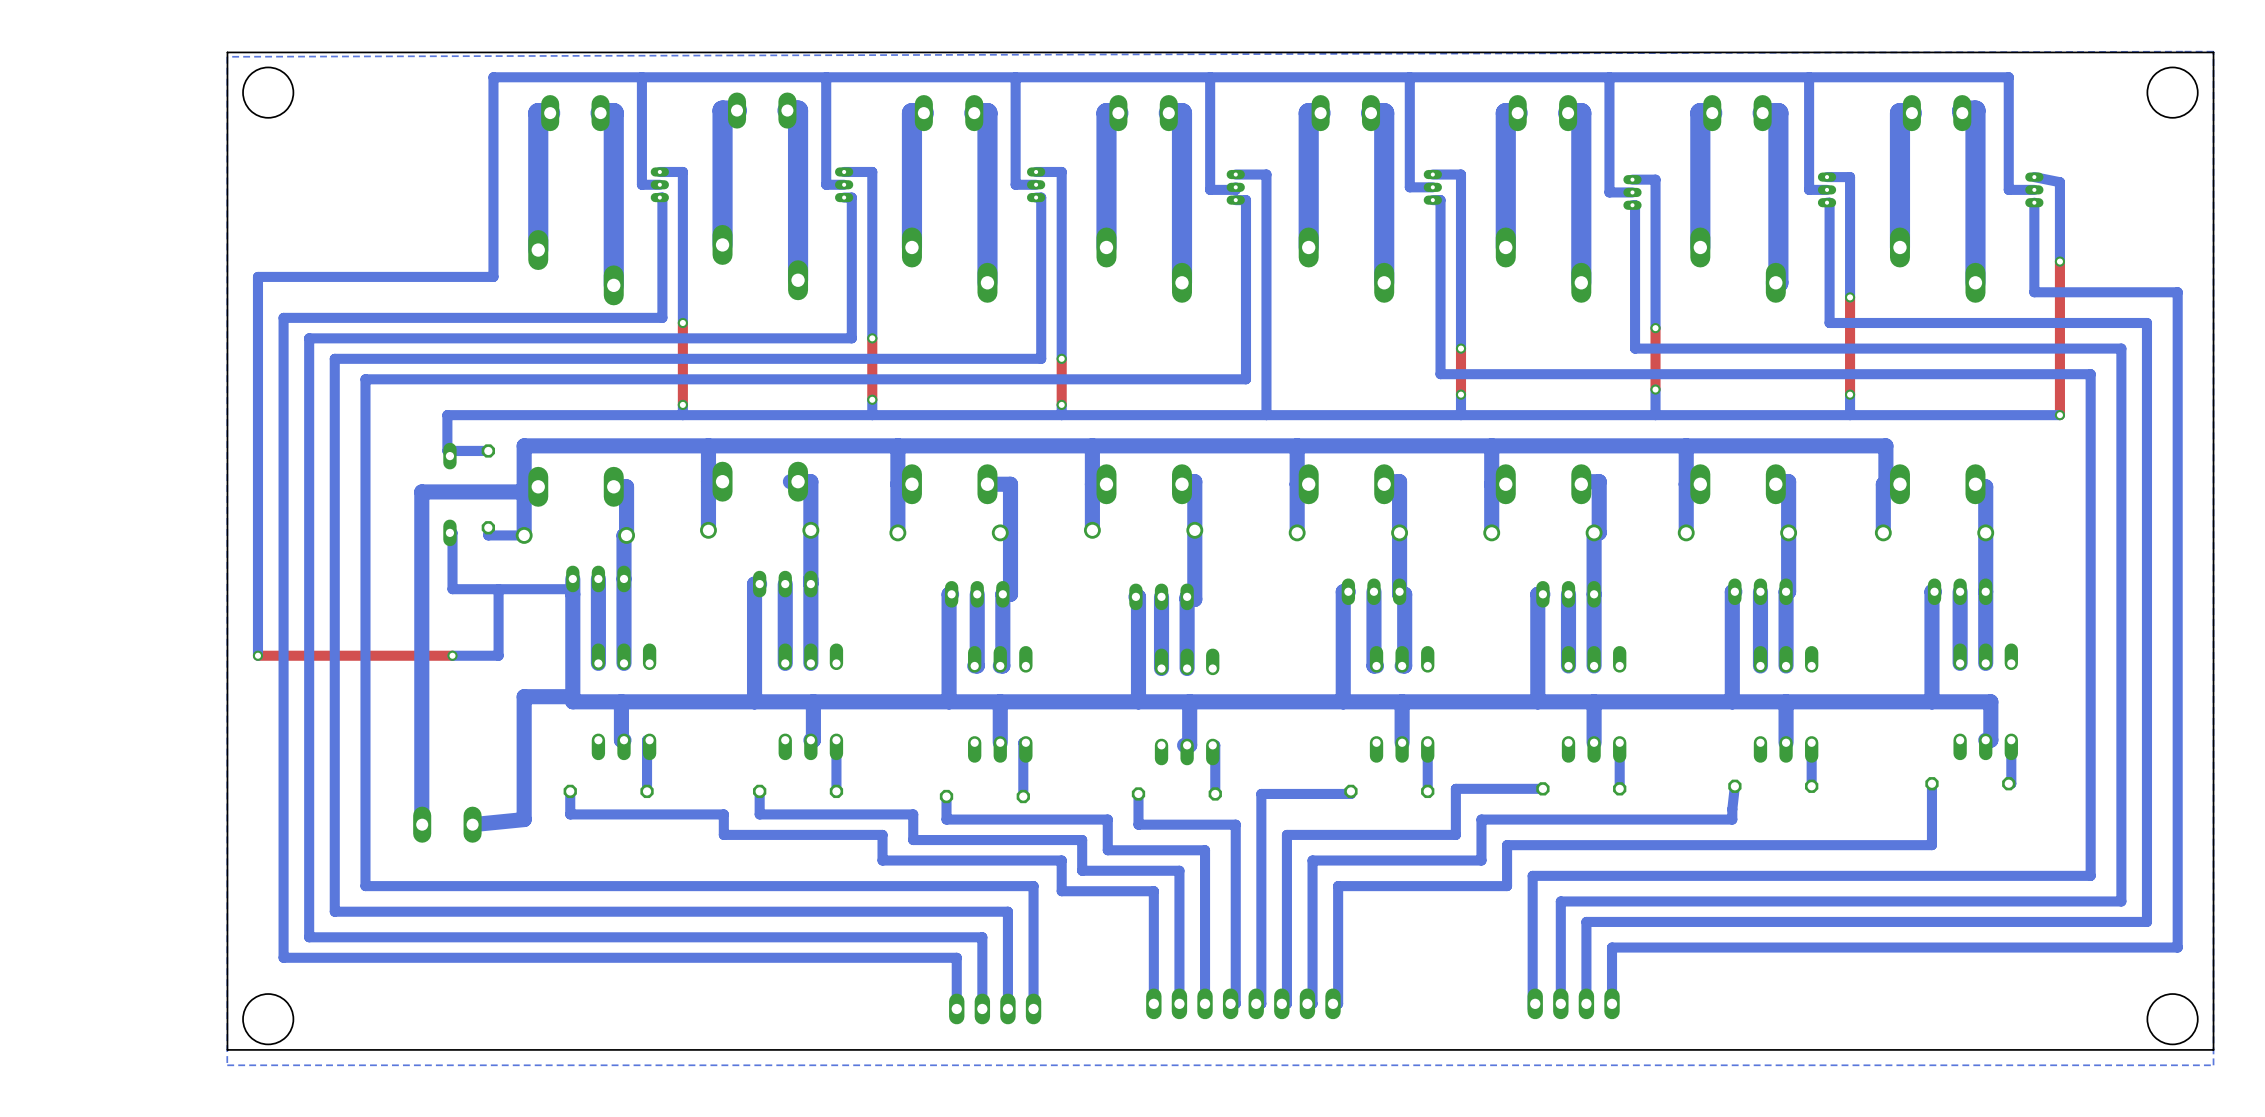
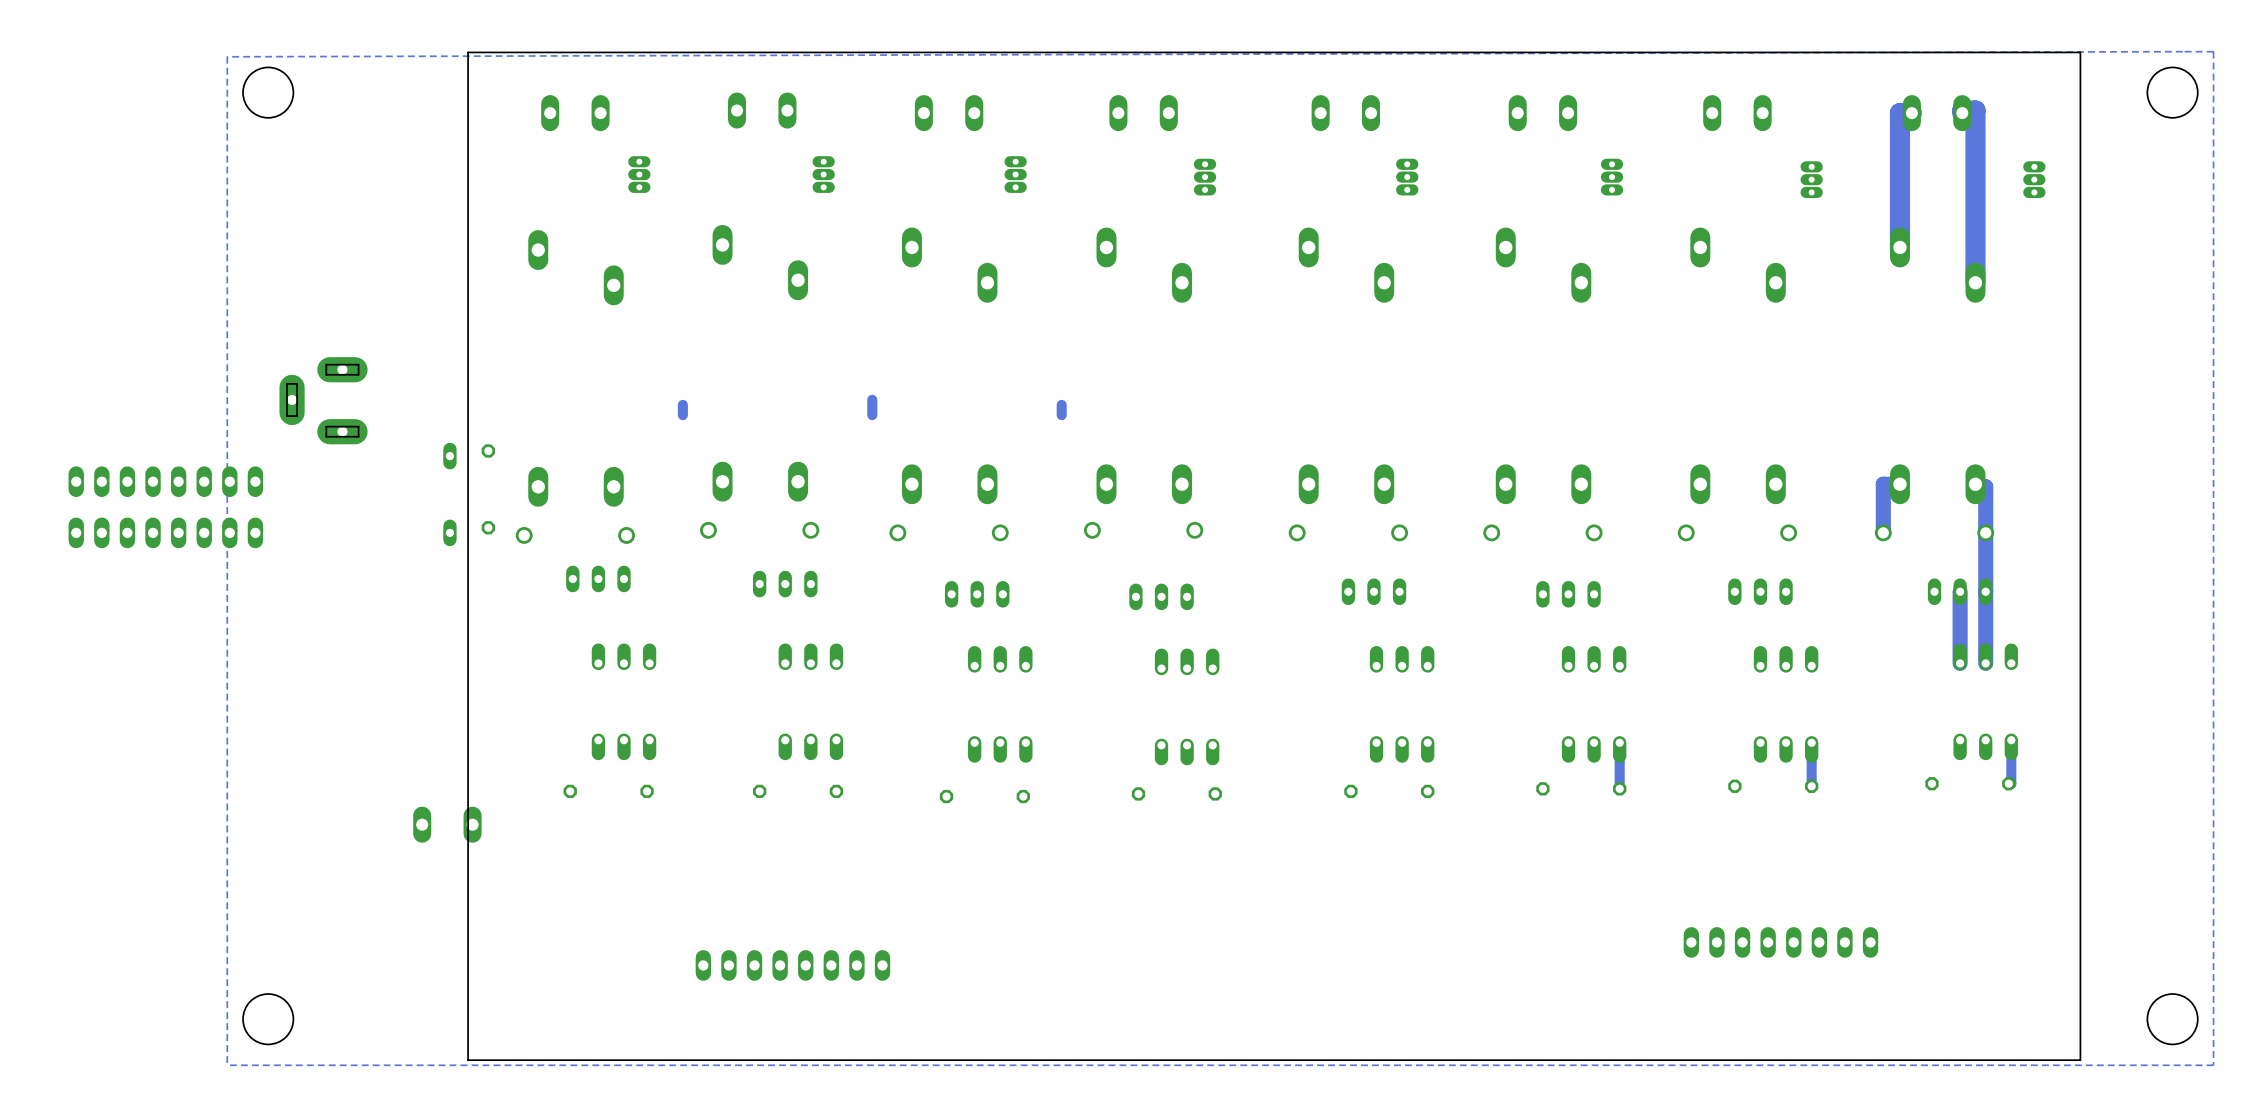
board edge: (2080, 52) (2213, 52) (2213, 1049) (227, 1049) (227, 52) (468, 52) -> (2080, 52) (2080, 1060) (468, 1060) (468, 52)
bottom track: (641, 77) (641, 184) (659, 184) -> none
bottom track: (826, 77) (826, 184) (844, 184) -> none
bottom track: (1015, 77) (1015, 184) (1036, 184) -> none
bottom track: (1210, 77) (1210, 189) (1235, 189) (1235, 187) -> none
bottom track: (1409, 77) (1409, 187) (1432, 187) -> none
bottom track: (1609, 77) (1609, 192) (1632, 192) -> none
bottom track: (1809, 77) (1809, 189) (1827, 189) -> none
bottom track: (737, 110) (722, 110) (722, 244) -> none
bottom track: (787, 110) (798, 110) (798, 280) -> none
bottom track: (550, 113) (538, 113) (538, 250) -> none
bottom track: (600, 113) (613, 113) (613, 285) -> none
bottom track: (923, 113) (911, 113) (911, 247) -> none
bottom track: (974, 113) (987, 113) (987, 282) -> none
bottom track: (1118, 113) (1106, 113) (1106, 247) -> none
bottom track: (1168, 113) (1182, 113) (1182, 282) -> none
bottom track: (1320, 113) (1308, 113) (1308, 247) -> none
bottom track: (1371, 113) (1384, 113) (1384, 282) -> none
bottom track: (1517, 113) (1505, 113) (1505, 247) -> none
bottom track: (1568, 113) (1581, 113) (1581, 282) -> none
bottom track: (1712, 113) (1700, 113) (1700, 247) -> none
bottom track: (1762, 113) (1778, 113) (1778, 282) (1775, 282) -> none
bottom track: (659, 171) (682, 171) (682, 322) -> none
bottom track: (844, 171) (872, 171) (872, 338) -> none
bottom track: (1036, 171) (1061, 171) (1061, 358) -> none
part: none -> (639, 174)
part: none -> (823, 174)
part: none -> (1015, 174)
bottom track: (1235, 174) (1266, 174) (1266, 415) -> none
bottom track: (1432, 174) (1461, 174) (1461, 348) -> none
part: none -> (1205, 177)
part: none -> (1407, 177)
part: none -> (1612, 177)
bottom track: (1827, 177) (1850, 177) (1850, 297) -> none
bottom track: (2034, 177) (2059, 182) (2059, 261) -> none
bottom track: (1632, 179) (1655, 179) (1655, 328) -> none
part: none -> (1811, 179)
part: none -> (2034, 179)
part: (659, 184) -> none
part: (844, 184) -> none
part: (1036, 184) -> none
part: (1235, 187) -> none
part: (1432, 187) -> none
part: (1827, 189) -> none
bottom track: (2034, 189) (2008, 189) (2008, 77) (493, 77) (493, 276) (257, 276) (257, 655) -> none
part: (2034, 189) -> none
part: (1632, 192) -> none
bottom track: (659, 197) (662, 197) (662, 317) (283, 317) (283, 957) (956, 957) (956, 1008) -> none
bottom track: (844, 197) (851, 197) (851, 338) (309, 338) (309, 937) (982, 937) (982, 1008) -> none
bottom track: (1036, 197) (1041, 197) (1041, 358) (334, 358) (334, 911) (1007, 911) (1007, 1008) -> none
bottom track: (1235, 200) (1245, 200) (1245, 379) (365, 379) (365, 886) (1033, 886) (1033, 1008) -> none
bottom track: (1432, 200) (1440, 200) (1440, 374) (2090, 374) (2090, 875) (1532, 875) (1532, 1008) -> none
bottom track: (1827, 202) (1829, 202) (1829, 322) (2146, 322) (2146, 921) (1586, 921) (1586, 1003) -> none
bottom track: (2034, 202) (2034, 292) (2177, 292) (2177, 947) (1612, 947) (1612, 1003) -> none
bottom track: (1632, 205) (1635, 205) (1635, 348) (2121, 348) (2121, 901) (1560, 901) (1560, 1003) -> none
top track: (2059, 261) (2059, 415) -> none
via: (2059, 261) -> none
top track: (1850, 297) (1850, 394) -> none
via: (1850, 297) -> none
top track: (682, 322) (682, 404) -> none
via: (682, 322) -> none
top track: (1655, 328) (1655, 389) -> none
via: (1655, 328) -> none
top track: (872, 338) (872, 399) -> none
via: (872, 338) -> none
top track: (1461, 348) (1461, 394) -> none
via: (1461, 348) -> none
top track: (1061, 358) (1061, 404) -> none
via: (1061, 358) -> none
bottom track: (1655, 389) (1655, 415) -> none
via: (1655, 389) -> none
bottom track: (1461, 394) (1461, 415) -> none
via: (1461, 394) -> none
bottom track: (1850, 394) (1850, 415) -> none
via: (1850, 394) -> none
via: (872, 399) -> none
part: none -> (323, 400)
via: (682, 404) -> none
via: (1061, 404) -> none
bottom track: (2059, 415) (447, 415) (447, 450) (488, 450) -> none
via: (2059, 415) -> none
bottom track: (708, 445) (708, 530) -> none
bottom track: (897, 445) (897, 532) -> none
bottom track: (1092, 445) (1092, 530) -> none
bottom track: (1297, 445) (1297, 532) -> none
bottom track: (1491, 445) (1491, 532) -> none
bottom track: (1686, 445) (1686, 532) -> none
part: none -> (165, 481)
bottom track: (790, 481) (810, 481) (810, 663) -> none
bottom track: (987, 484) (1010, 484) (1010, 594) (1002, 594) (1002, 665) (1000, 665) -> none
bottom track: (1182, 484) (1182, 481) (1194, 481) (1194, 599) (1187, 599) -> none
bottom track: (1384, 484) (1384, 481) (1399, 481) (1399, 594) (1404, 594) (1404, 665) (1402, 665) -> none
bottom track: (1581, 484) (1581, 481) (1599, 481) (1599, 532) (1594, 532) (1594, 665) -> none
bottom track: (1775, 484) (1775, 481) (1788, 481) (1788, 591) (1786, 591) (1786, 665) -> none
bottom track: (1885, 484) (1885, 445) (524, 445) (524, 535) (488, 535) (488, 527) -> none
bottom track: (613, 486) (626, 486) (626, 535) (624, 535) (624, 663) -> none
bottom track: (524, 491) (421, 491) (422, 824) -> none
part: none -> (165, 532)
bottom track: (449, 532) (452, 532) (452, 589) (572, 589) (572, 594) -> none
bottom track: (572, 578) (572, 701) (1990, 701) (1990, 740) (1985, 740) -> none
bottom track: (598, 578) (598, 663) -> none
bottom track: (759, 584) (754, 584) (754, 701) -> none
bottom track: (785, 584) (785, 663) -> none
bottom track: (498, 589) (498, 655) (452, 655) -> none
bottom track: (1348, 591) (1343, 591) (1343, 701) -> none
bottom track: (1373, 591) (1373, 665) (1376, 665) -> none
bottom track: (1734, 591) (1732, 591) (1732, 701) -> none
bottom track: (1760, 591) (1760, 665) -> none
bottom track: (1934, 591) (1931, 591) (1931, 701) -> none
bottom track: (951, 594) (949, 594) (949, 701) -> none
bottom track: (977, 594) (977, 665) (974, 665) -> none
bottom track: (1542, 594) (1537, 594) (1537, 701) -> none
bottom track: (1568, 594) (1568, 665) -> none
bottom track: (1135, 596) (1138, 596) (1138, 701) -> none
bottom track: (1161, 596) (1161, 668) -> none
bottom track: (1187, 596) (1187, 668) -> none
via: (257, 655) -> none
top track: (452, 655) (257, 655) -> none
via: (452, 655) -> none
bottom track: (572, 696) (524, 696) (524, 819) (472, 824) -> none
bottom track: (621, 701) (621, 740) (624, 740) -> none
bottom track: (813, 701) (813, 740) (810, 740) -> none
bottom track: (1000, 701) (1000, 742) -> none
bottom track: (1189, 701) (1189, 745) (1184, 745) -> none
bottom track: (1402, 701) (1402, 742) -> none
bottom track: (1594, 701) (1594, 742) -> none
bottom track: (1786, 701) (1786, 742) -> none
bottom track: (649, 740) (647, 740) (647, 791) -> none
bottom track: (836, 740) (836, 791) -> none
bottom track: (1025, 742) (1023, 742) (1023, 796) -> none
bottom track: (1427, 742) (1427, 791) -> none
bottom track: (1212, 745) (1215, 745) (1215, 793) -> none
bottom track: (1931, 783) (1931, 845) (1507, 845) (1507, 886) (1338, 886) (1338, 1003) (1333, 1003) -> none
bottom track: (1734, 786) (1732, 819) (1481, 819) (1481, 860) (1312, 860) (1312, 1003) (1307, 1003) -> none
bottom track: (1542, 788) (1455, 788) (1455, 834) (1286, 834) (1286, 1003) (1281, 1003) -> none
bottom track: (570, 791) (570, 814) (723, 814) (723, 834) (882, 834) (882, 860) (1061, 860) (1061, 891) (1153, 891) (1153, 1003) -> none
bottom track: (759, 791) (759, 814) (913, 814) (913, 840) (1082, 840) (1082, 870) (1179, 870) (1179, 1003) -> none
bottom track: (1350, 791) (1350, 793) (1261, 793) (1261, 1003) (1256, 1003) -> none
bottom track: (1138, 793) (1138, 824) (1235, 824) (1235, 1003) (1230, 1003) -> none
bottom track: (946, 796) (946, 819) (1107, 819) (1107, 850) (1205, 850) (1205, 1003) -> none
part: none -> (1780, 942)
part: none -> (792, 965)
part: (1243, 1003) -> none
part: (1573, 1003) -> none
part: (995, 1008) -> none

